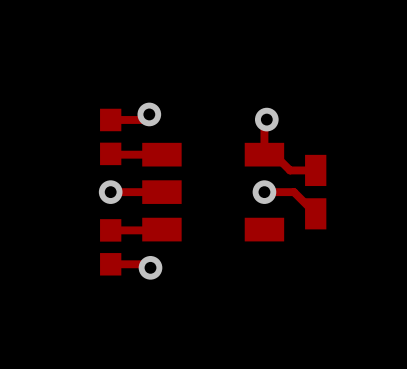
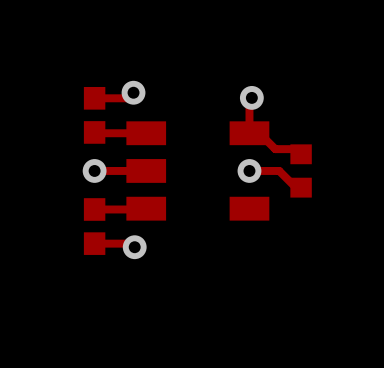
part footprint: [305, 154, 327, 230] -> [290, 144, 312, 198]

